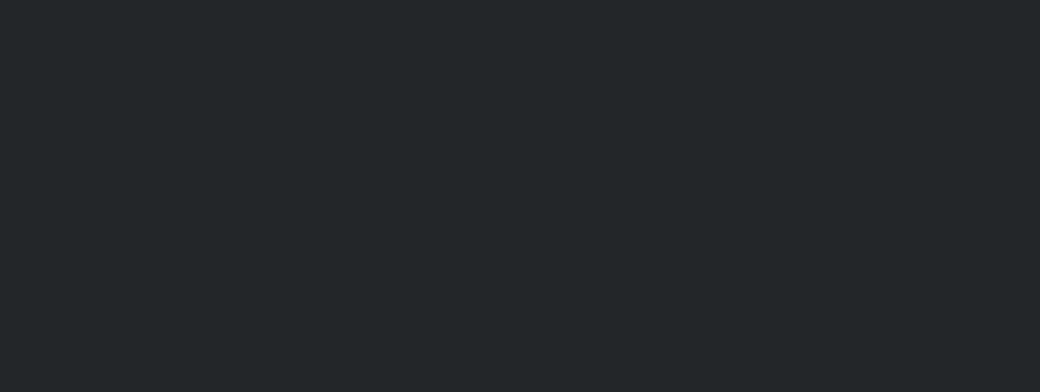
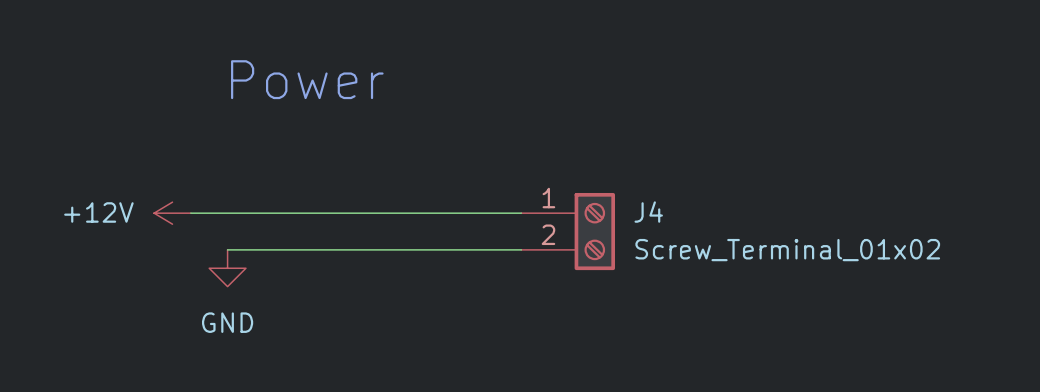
text: none -> Power (307, 79)
power symbol: none -> +12V (172, 213)
wire: none -> (190, 213) (521, 213)
J4: none -> Screw_Terminal_01x02 (568, 231)
wire: none -> (227, 249) (521, 249)
power symbol: none -> GND (227, 268)

